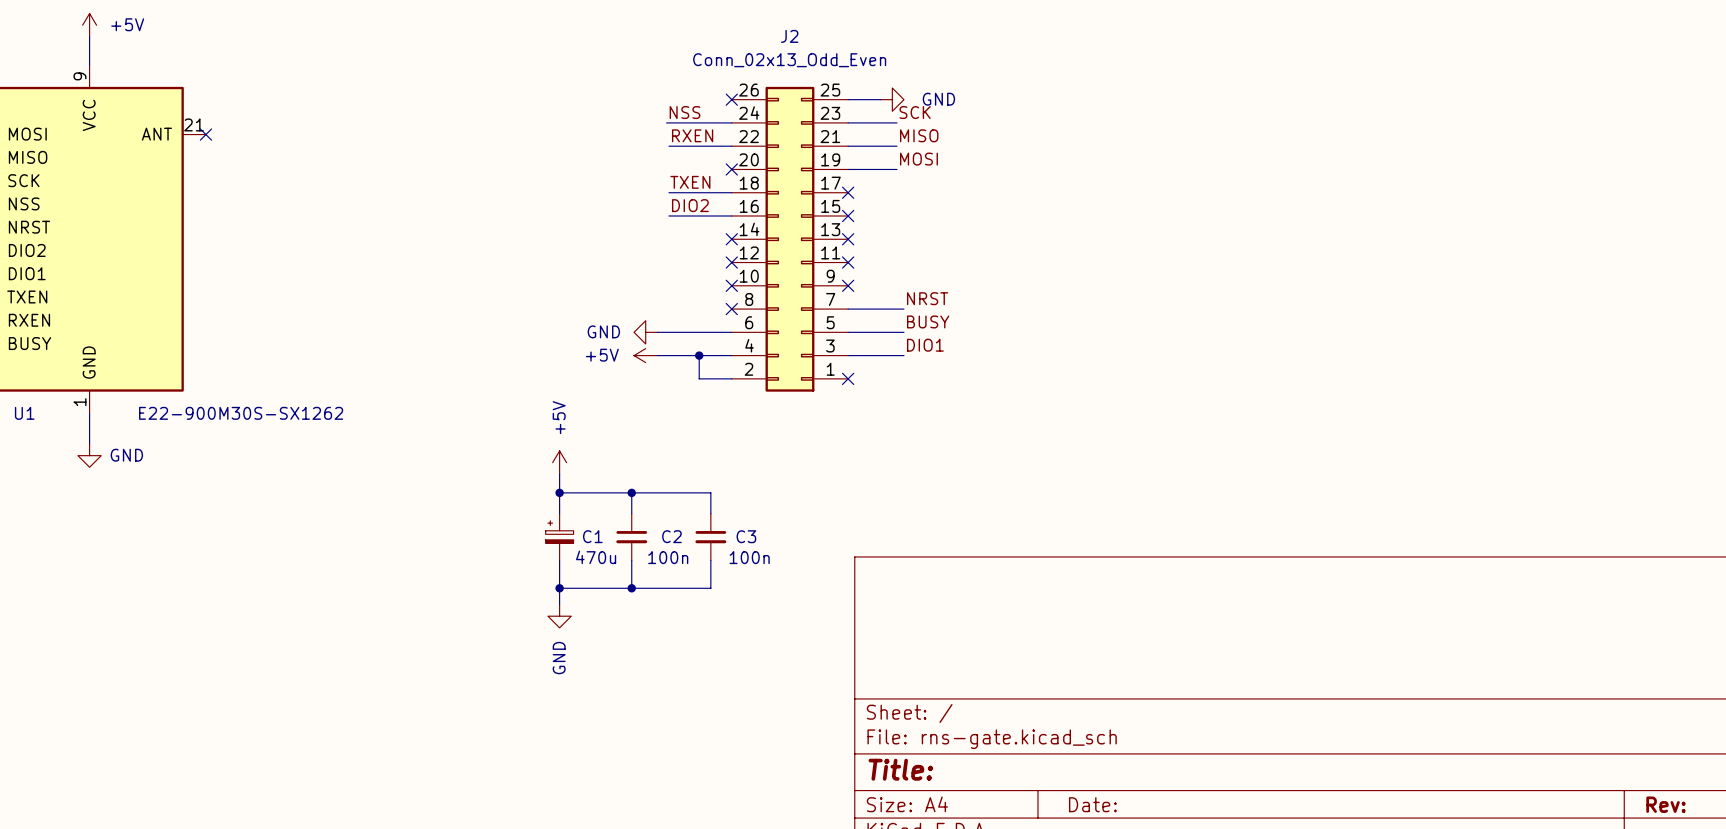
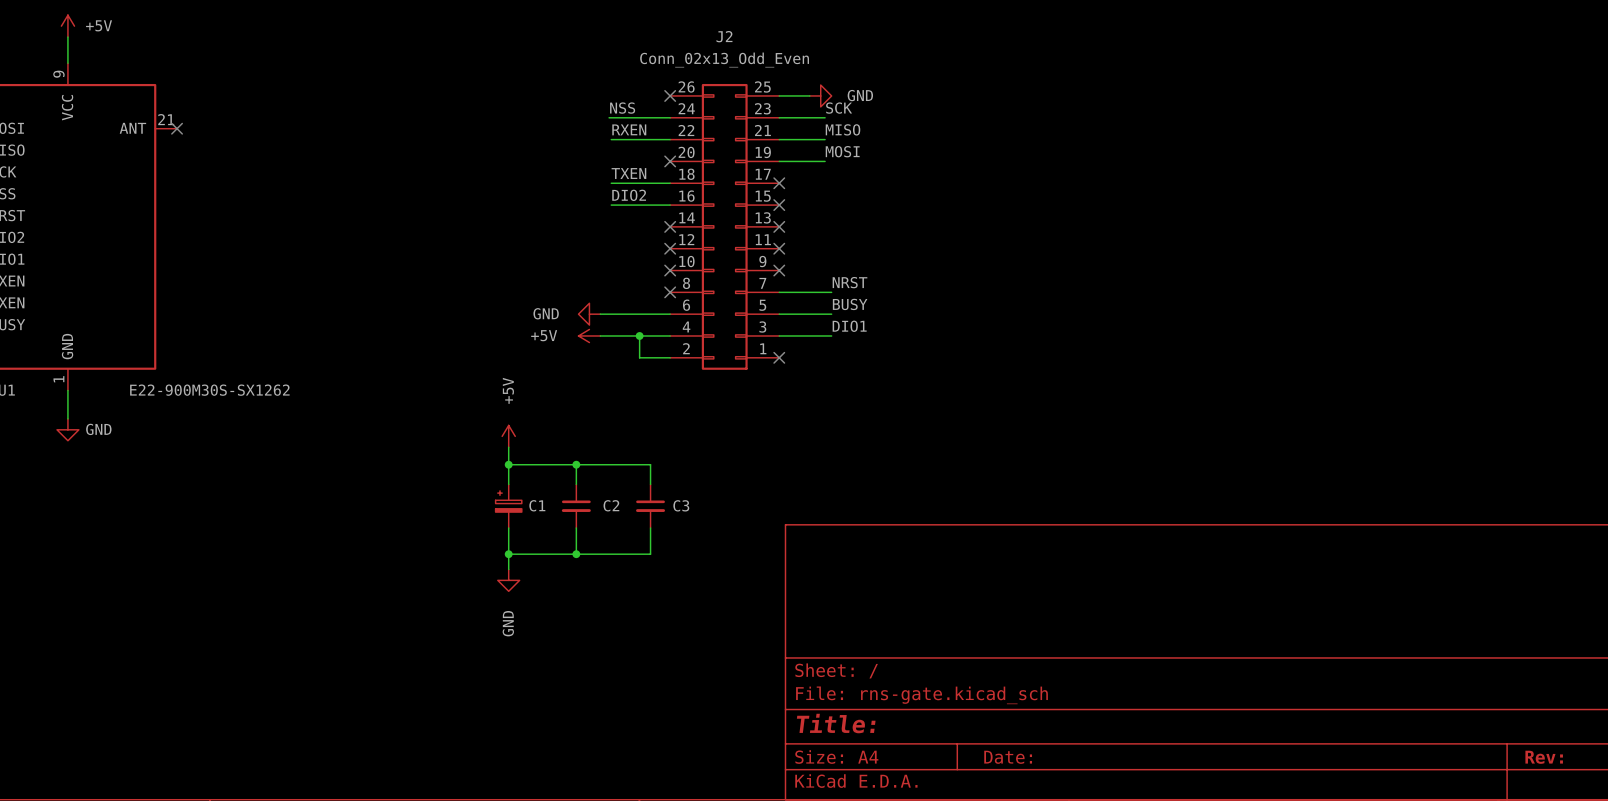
C1 value: 470u (596, 557) -> none
C2 value: 100n (668, 557) -> none
C3 value: 100n (749, 557) -> none

